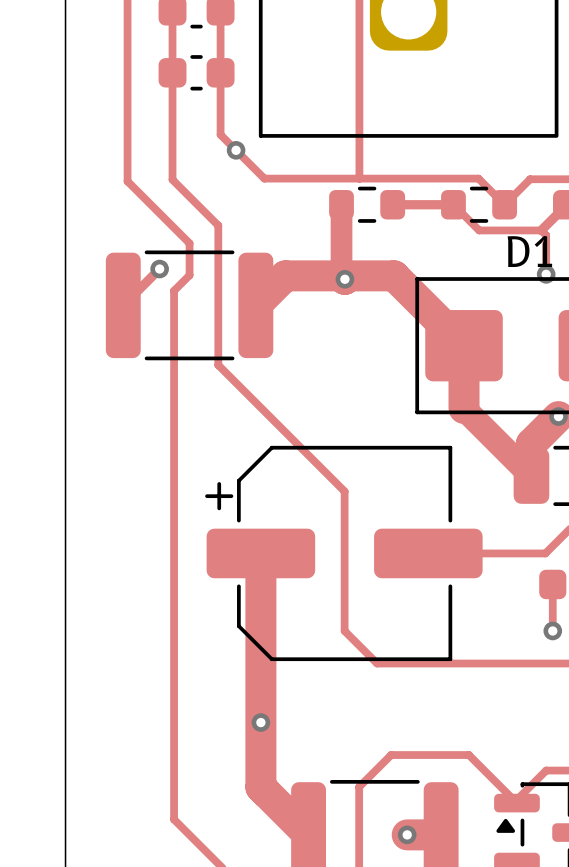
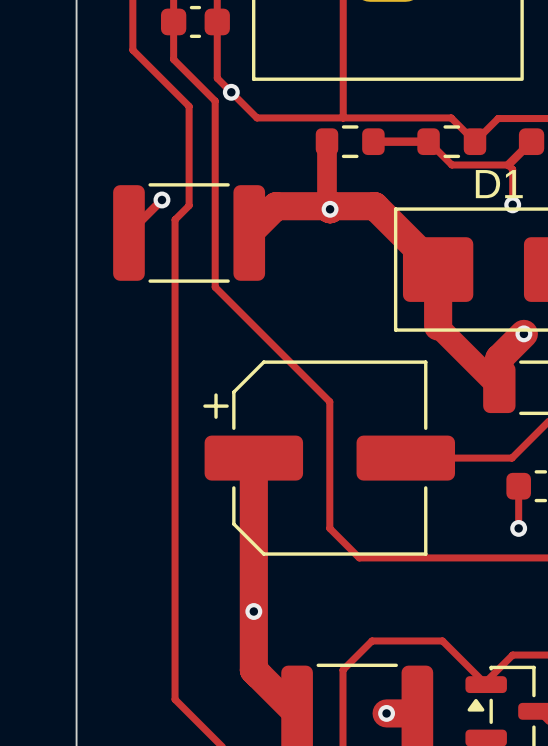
track: (127, 103) (127, 181) (189, 243) -> (132, 50) (189, 106) (189, 176)
track: (172, 114) (172, 179) (218, 225) -> (173, 59) (215, 101) (215, 160)

